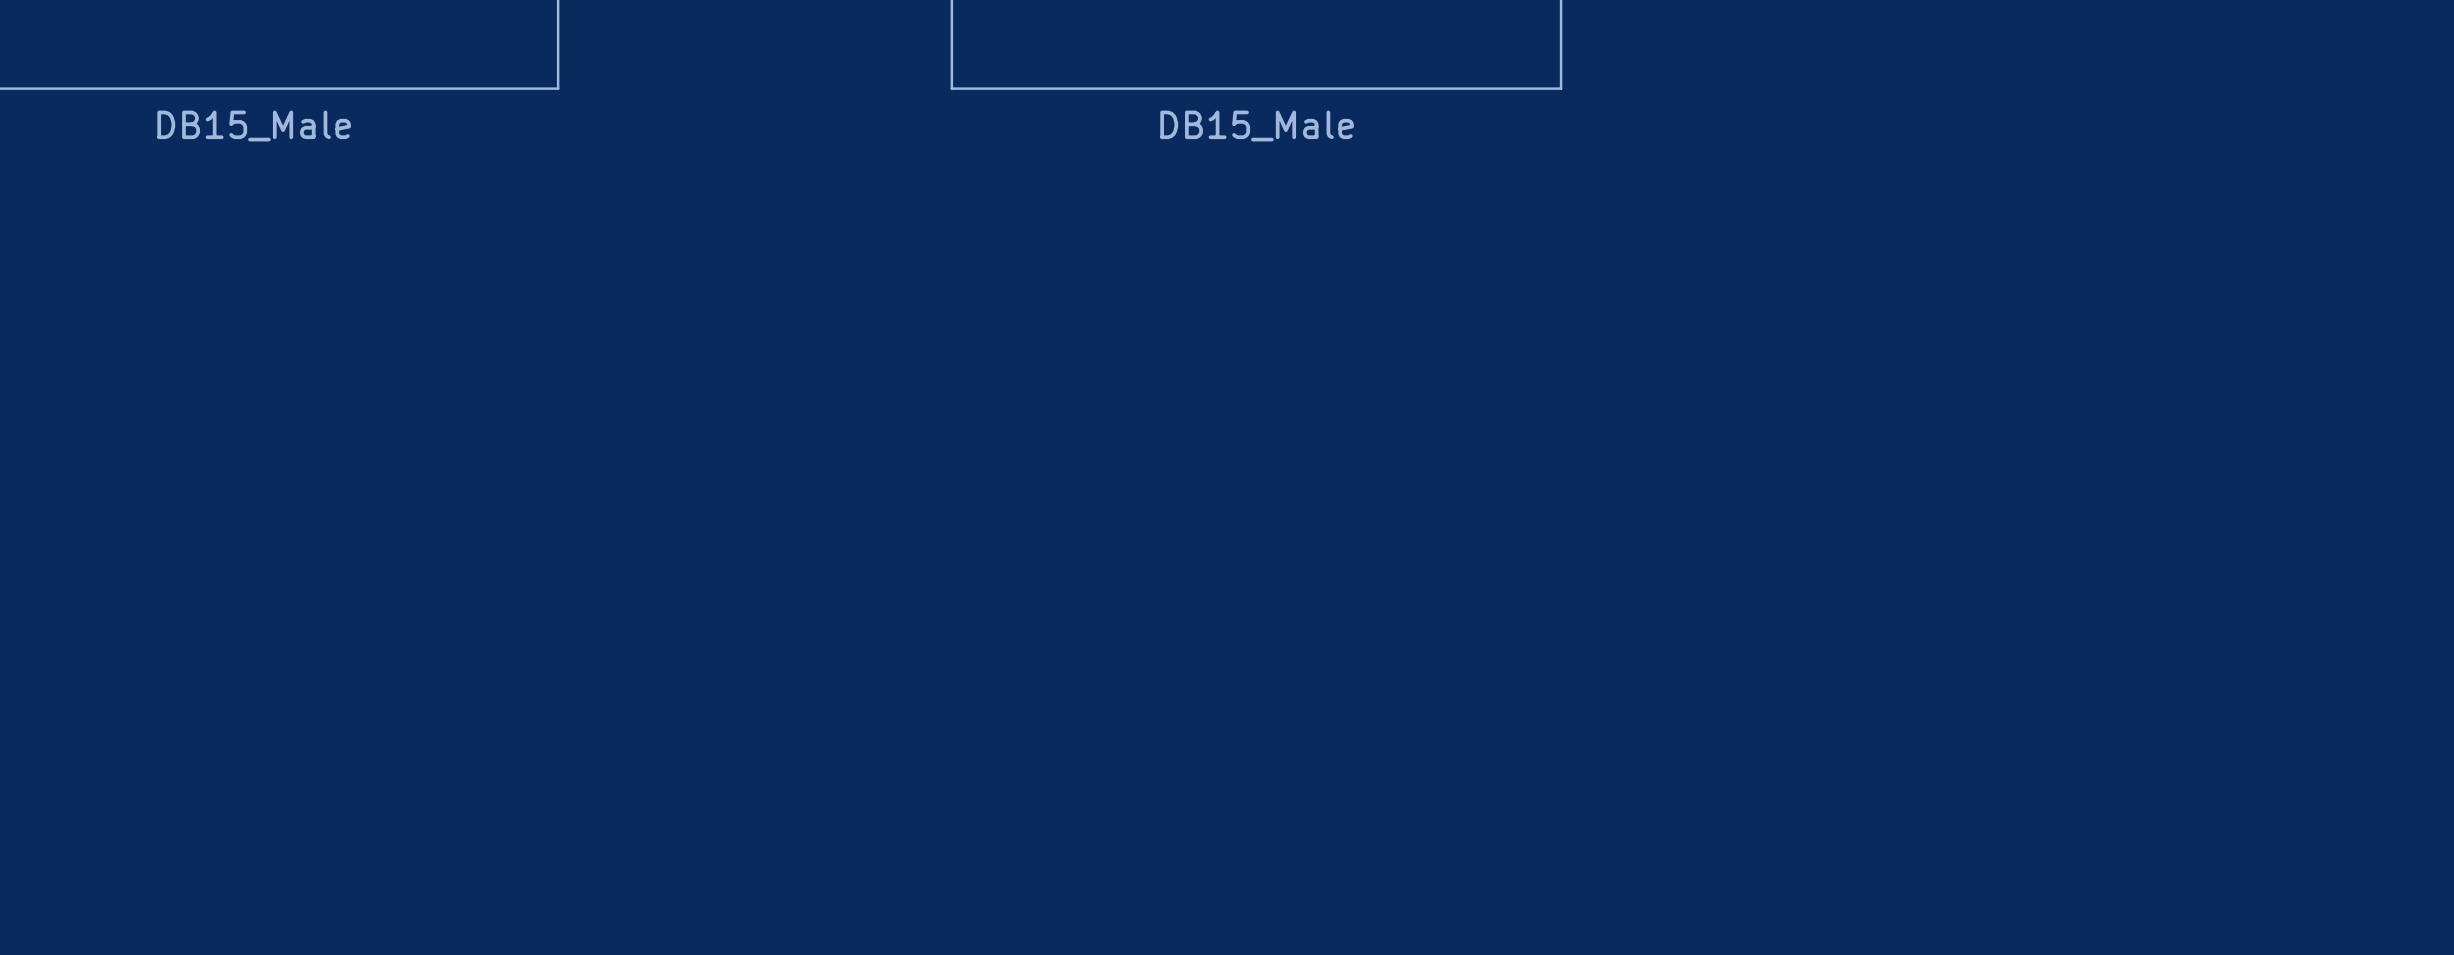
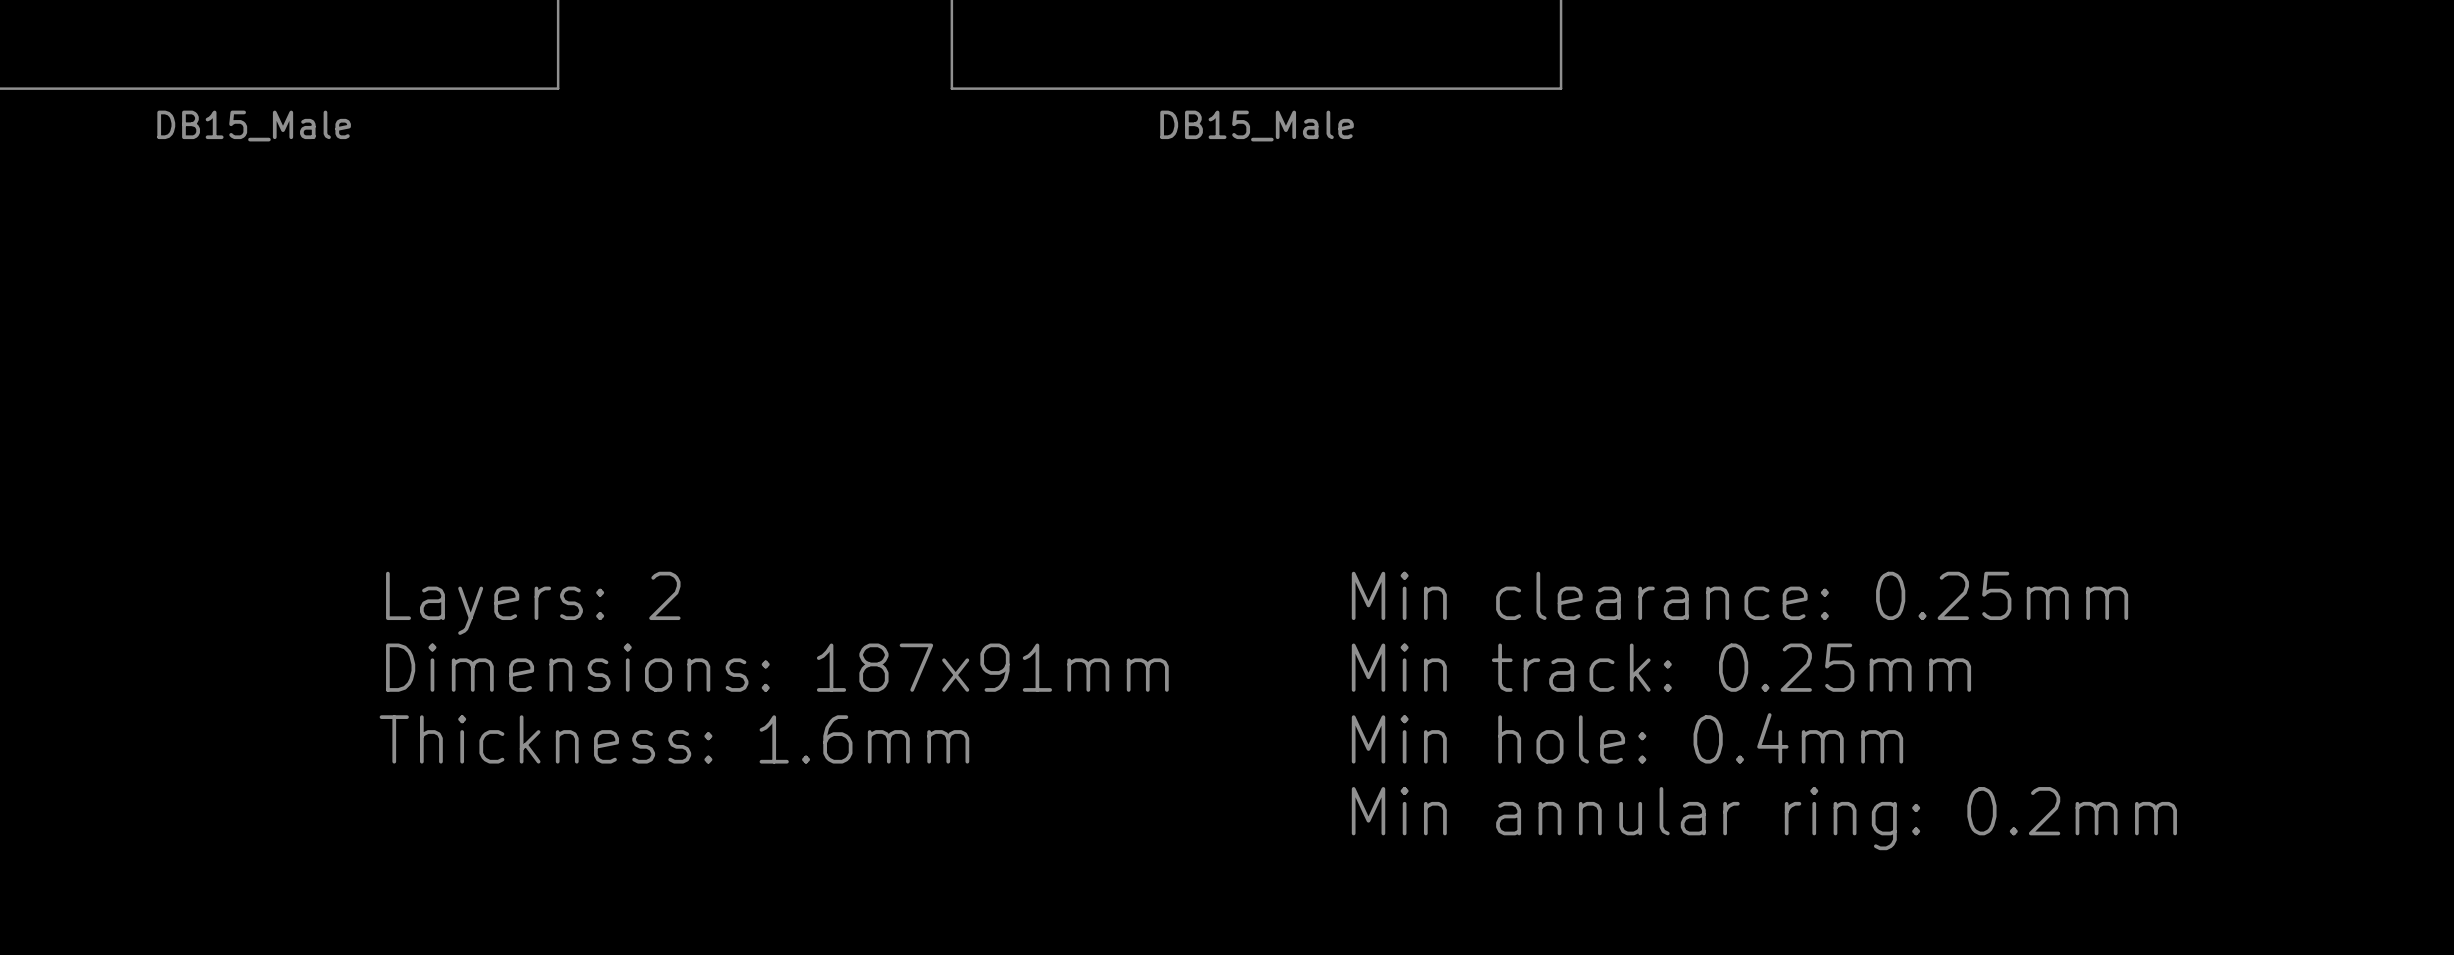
text: none -> Min clearance: 0.25mm (1739, 595)
text: none -> Layers: 2 (533, 603)
text: none -> Dimensions: 187x91mm (777, 667)
text: none -> Min track: 0.25mm (1661, 667)
text: none -> Min hole: 0.4mm (1627, 738)
text: none -> Thickness: 1.6mm (674, 739)
text: none -> Min annular ring: 0.2mm (1764, 818)

